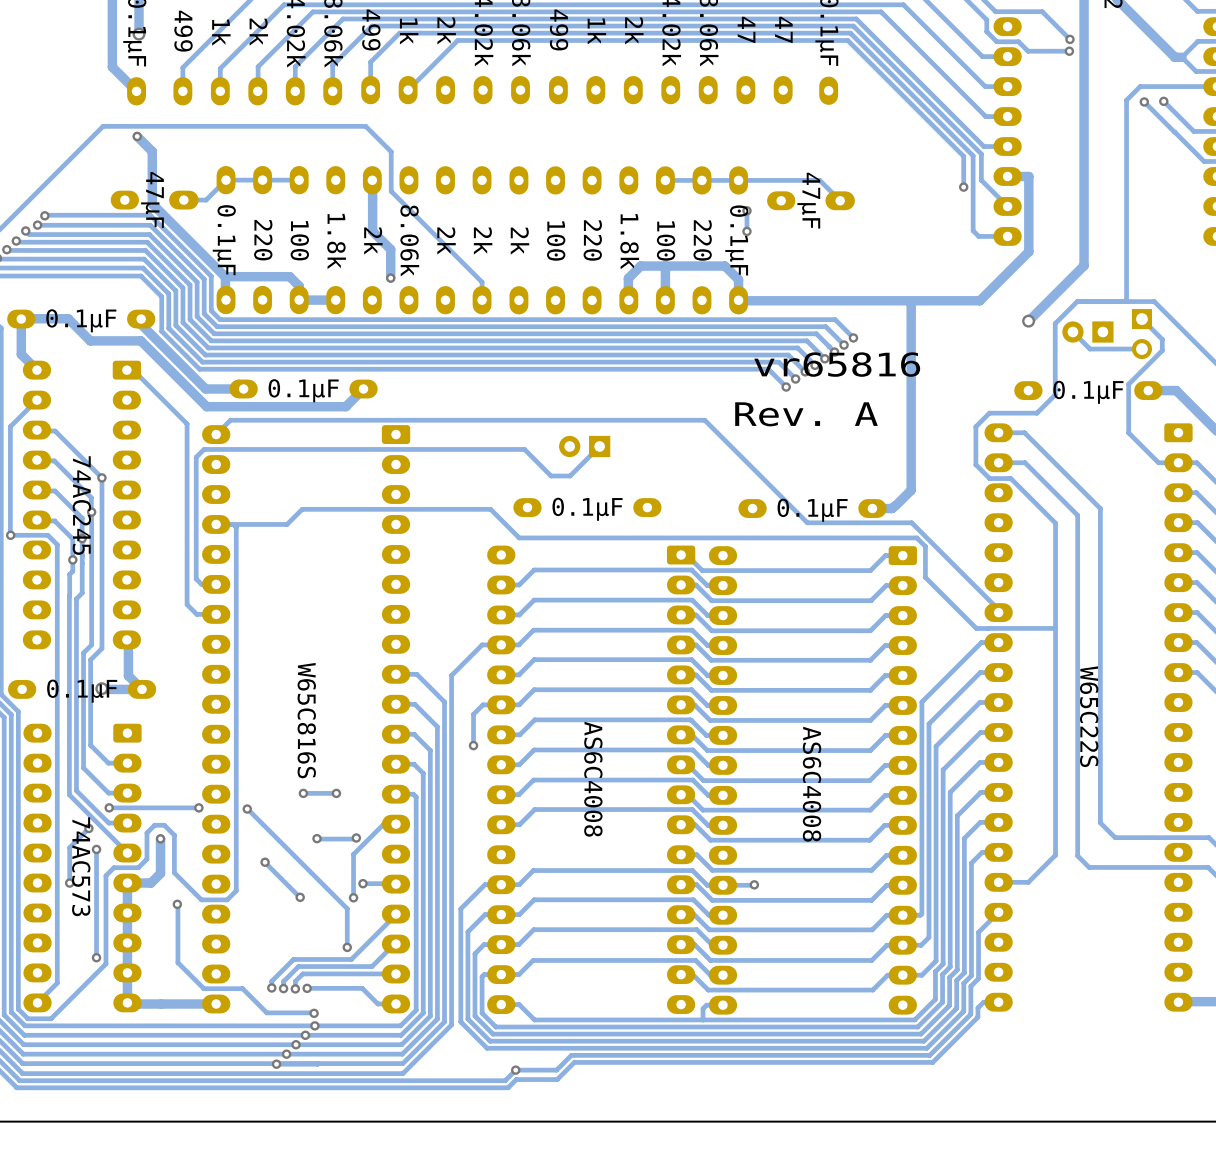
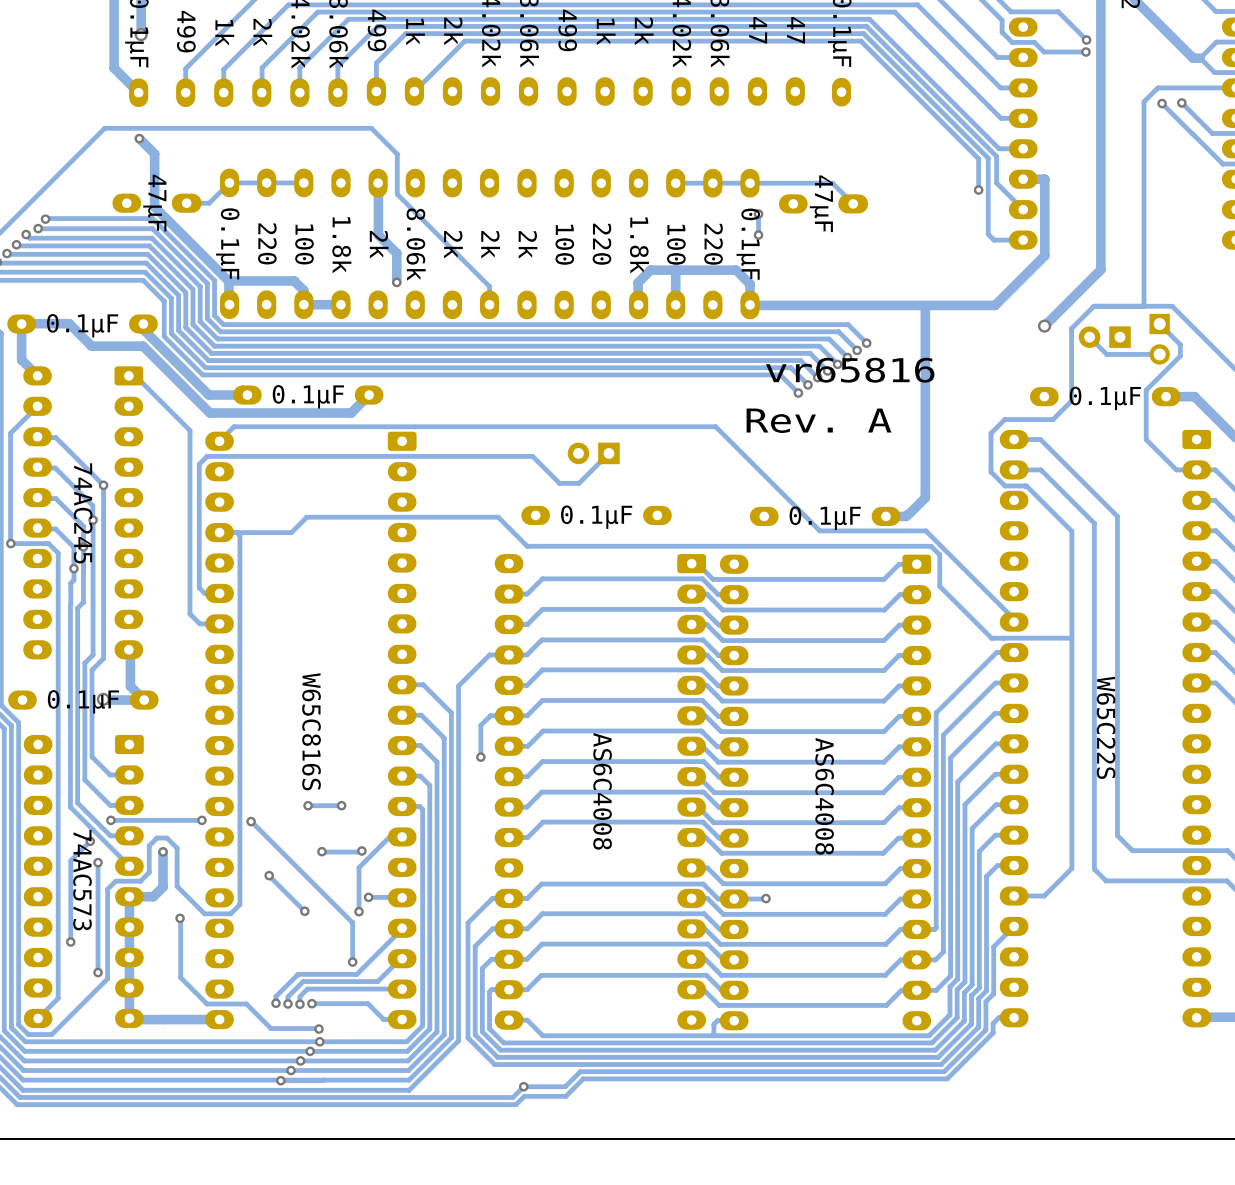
track: none -> (70, 896) (71, 942)
via position: (69, 883) -> (70, 942)

